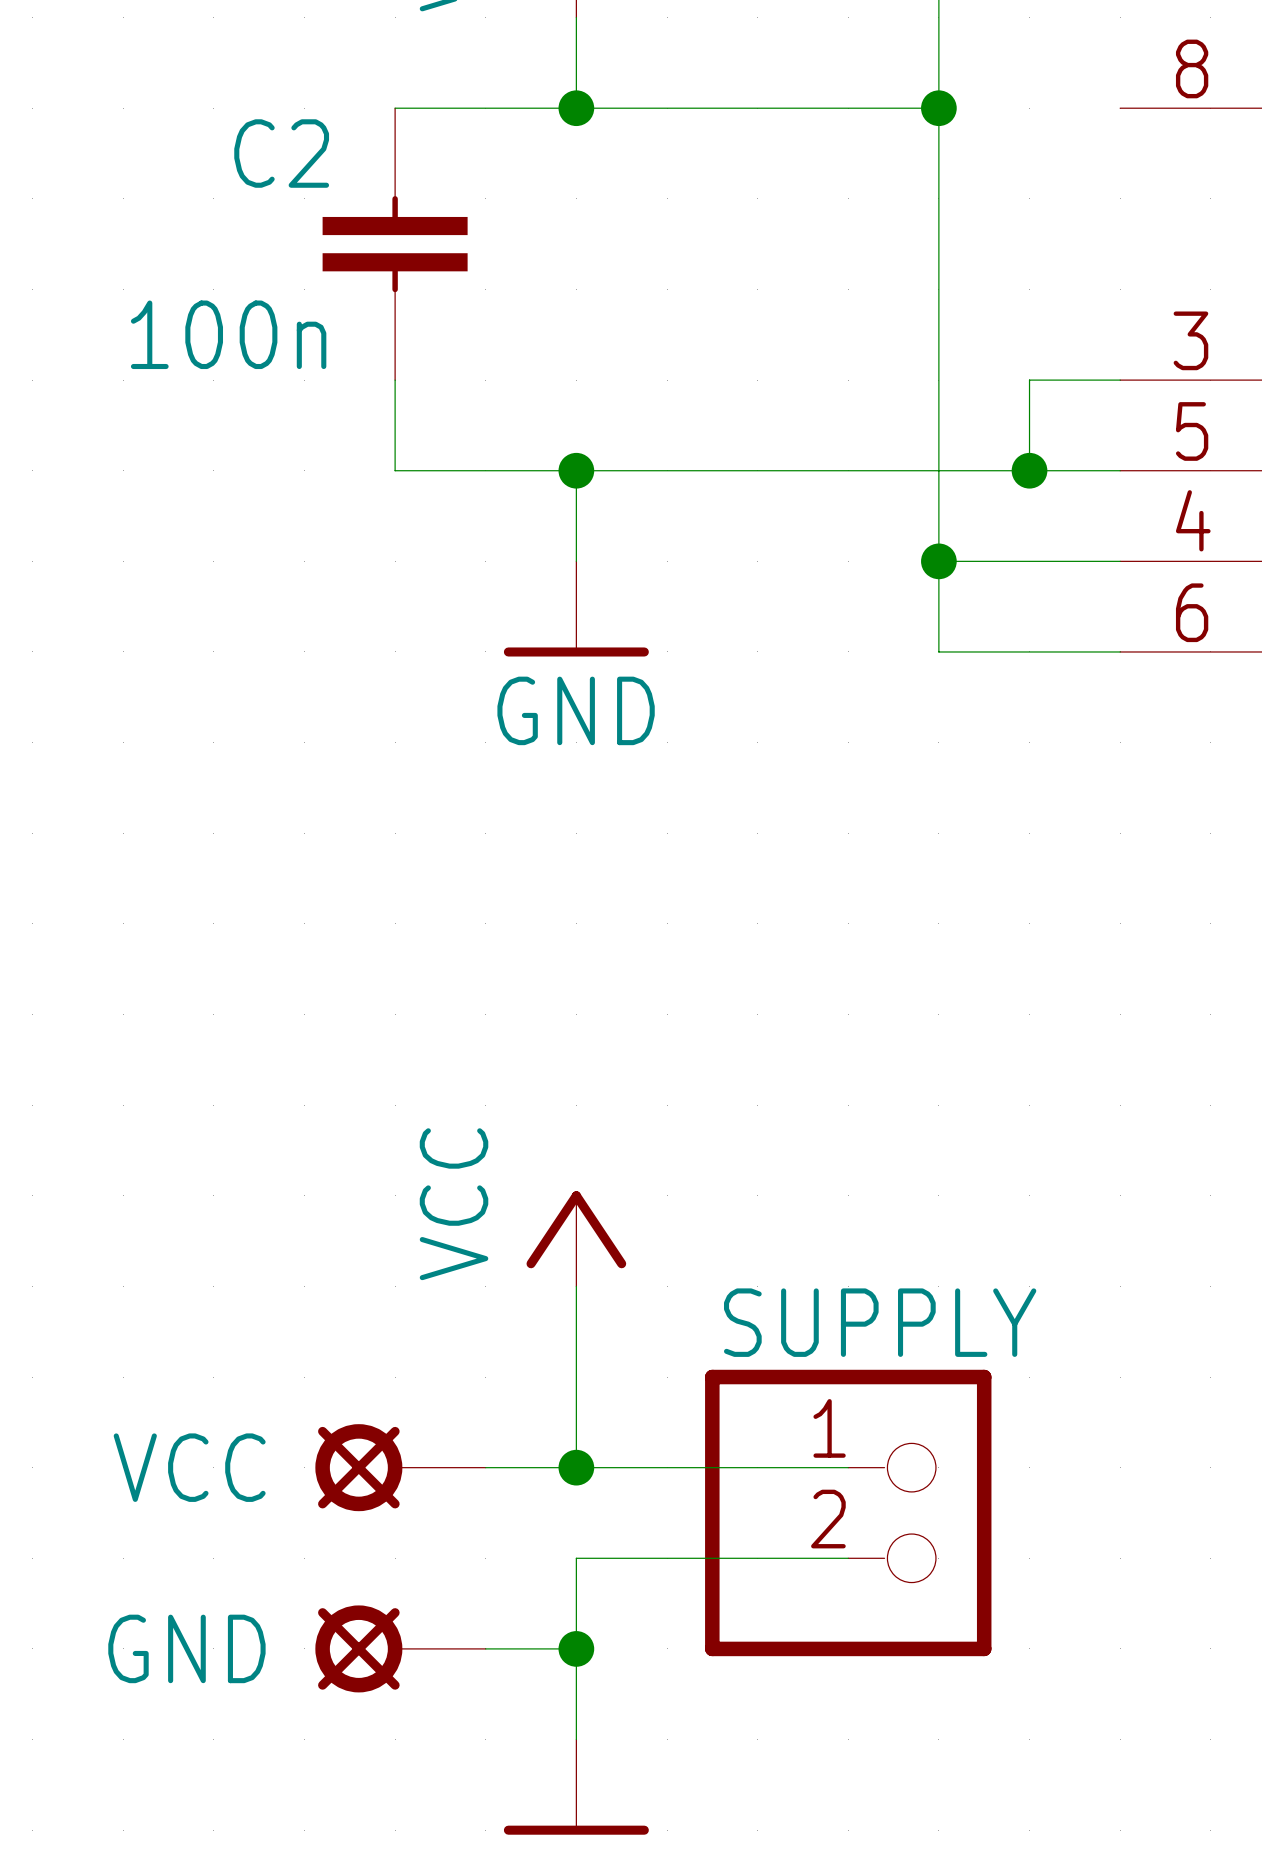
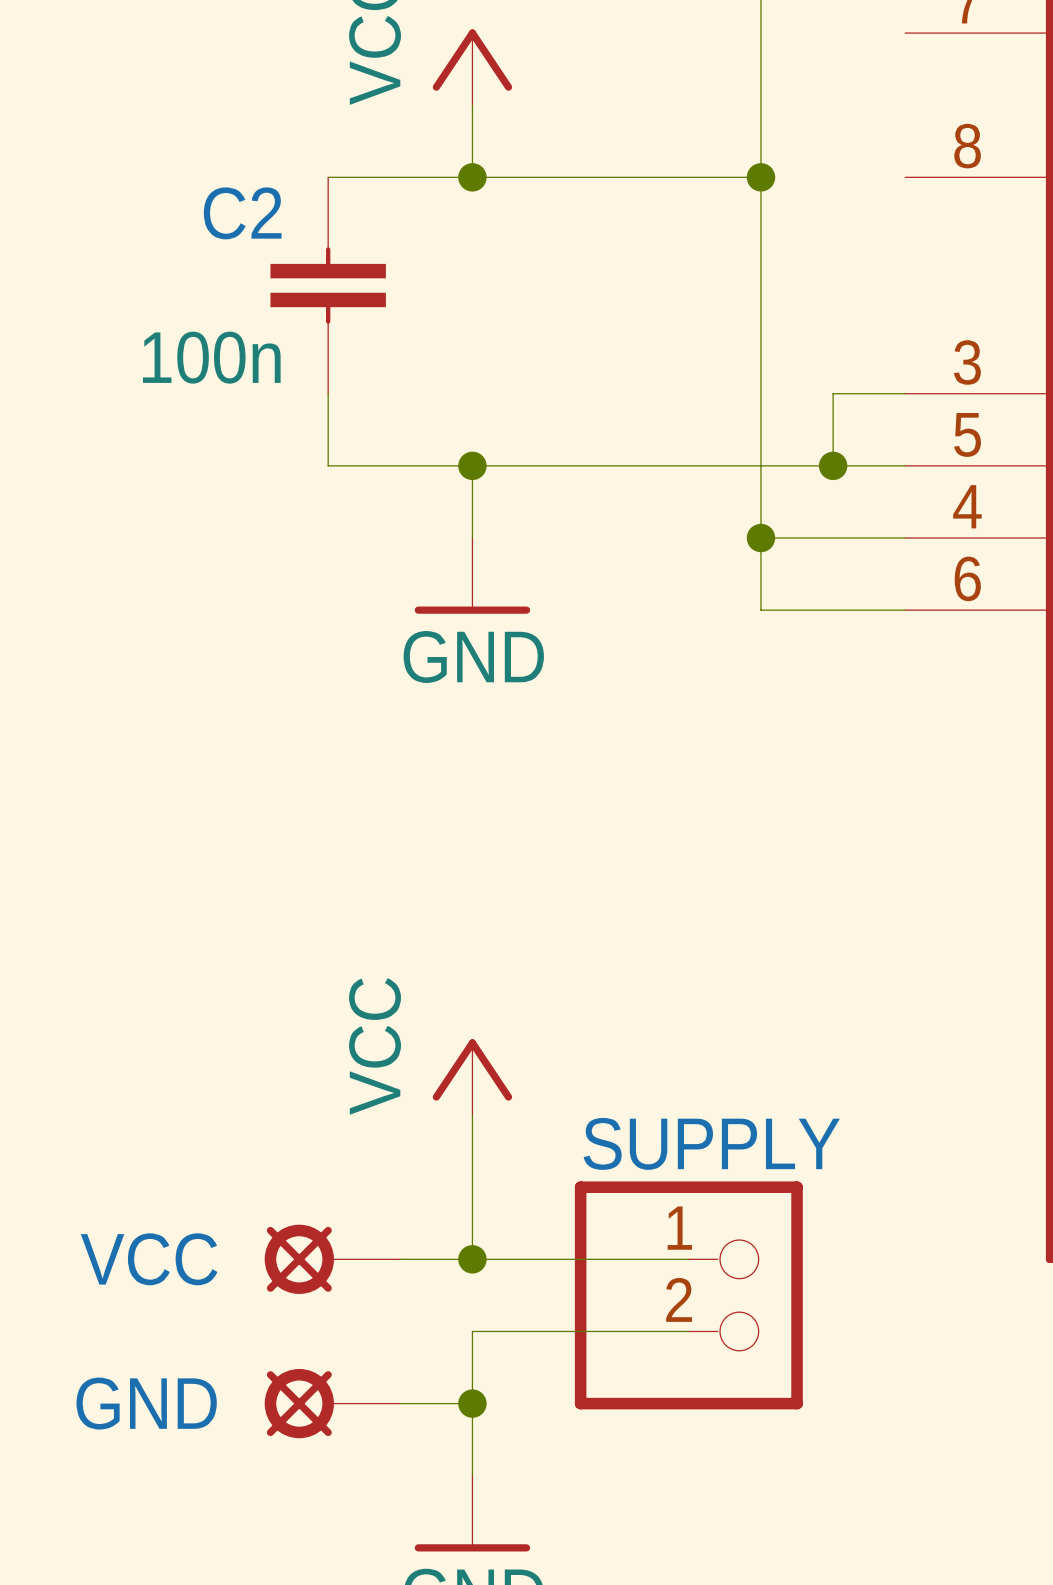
VCC name position: VCC (189, 1467) -> VCC (149, 1259)
GND name position: GND (186, 1648) -> GND (146, 1403)

